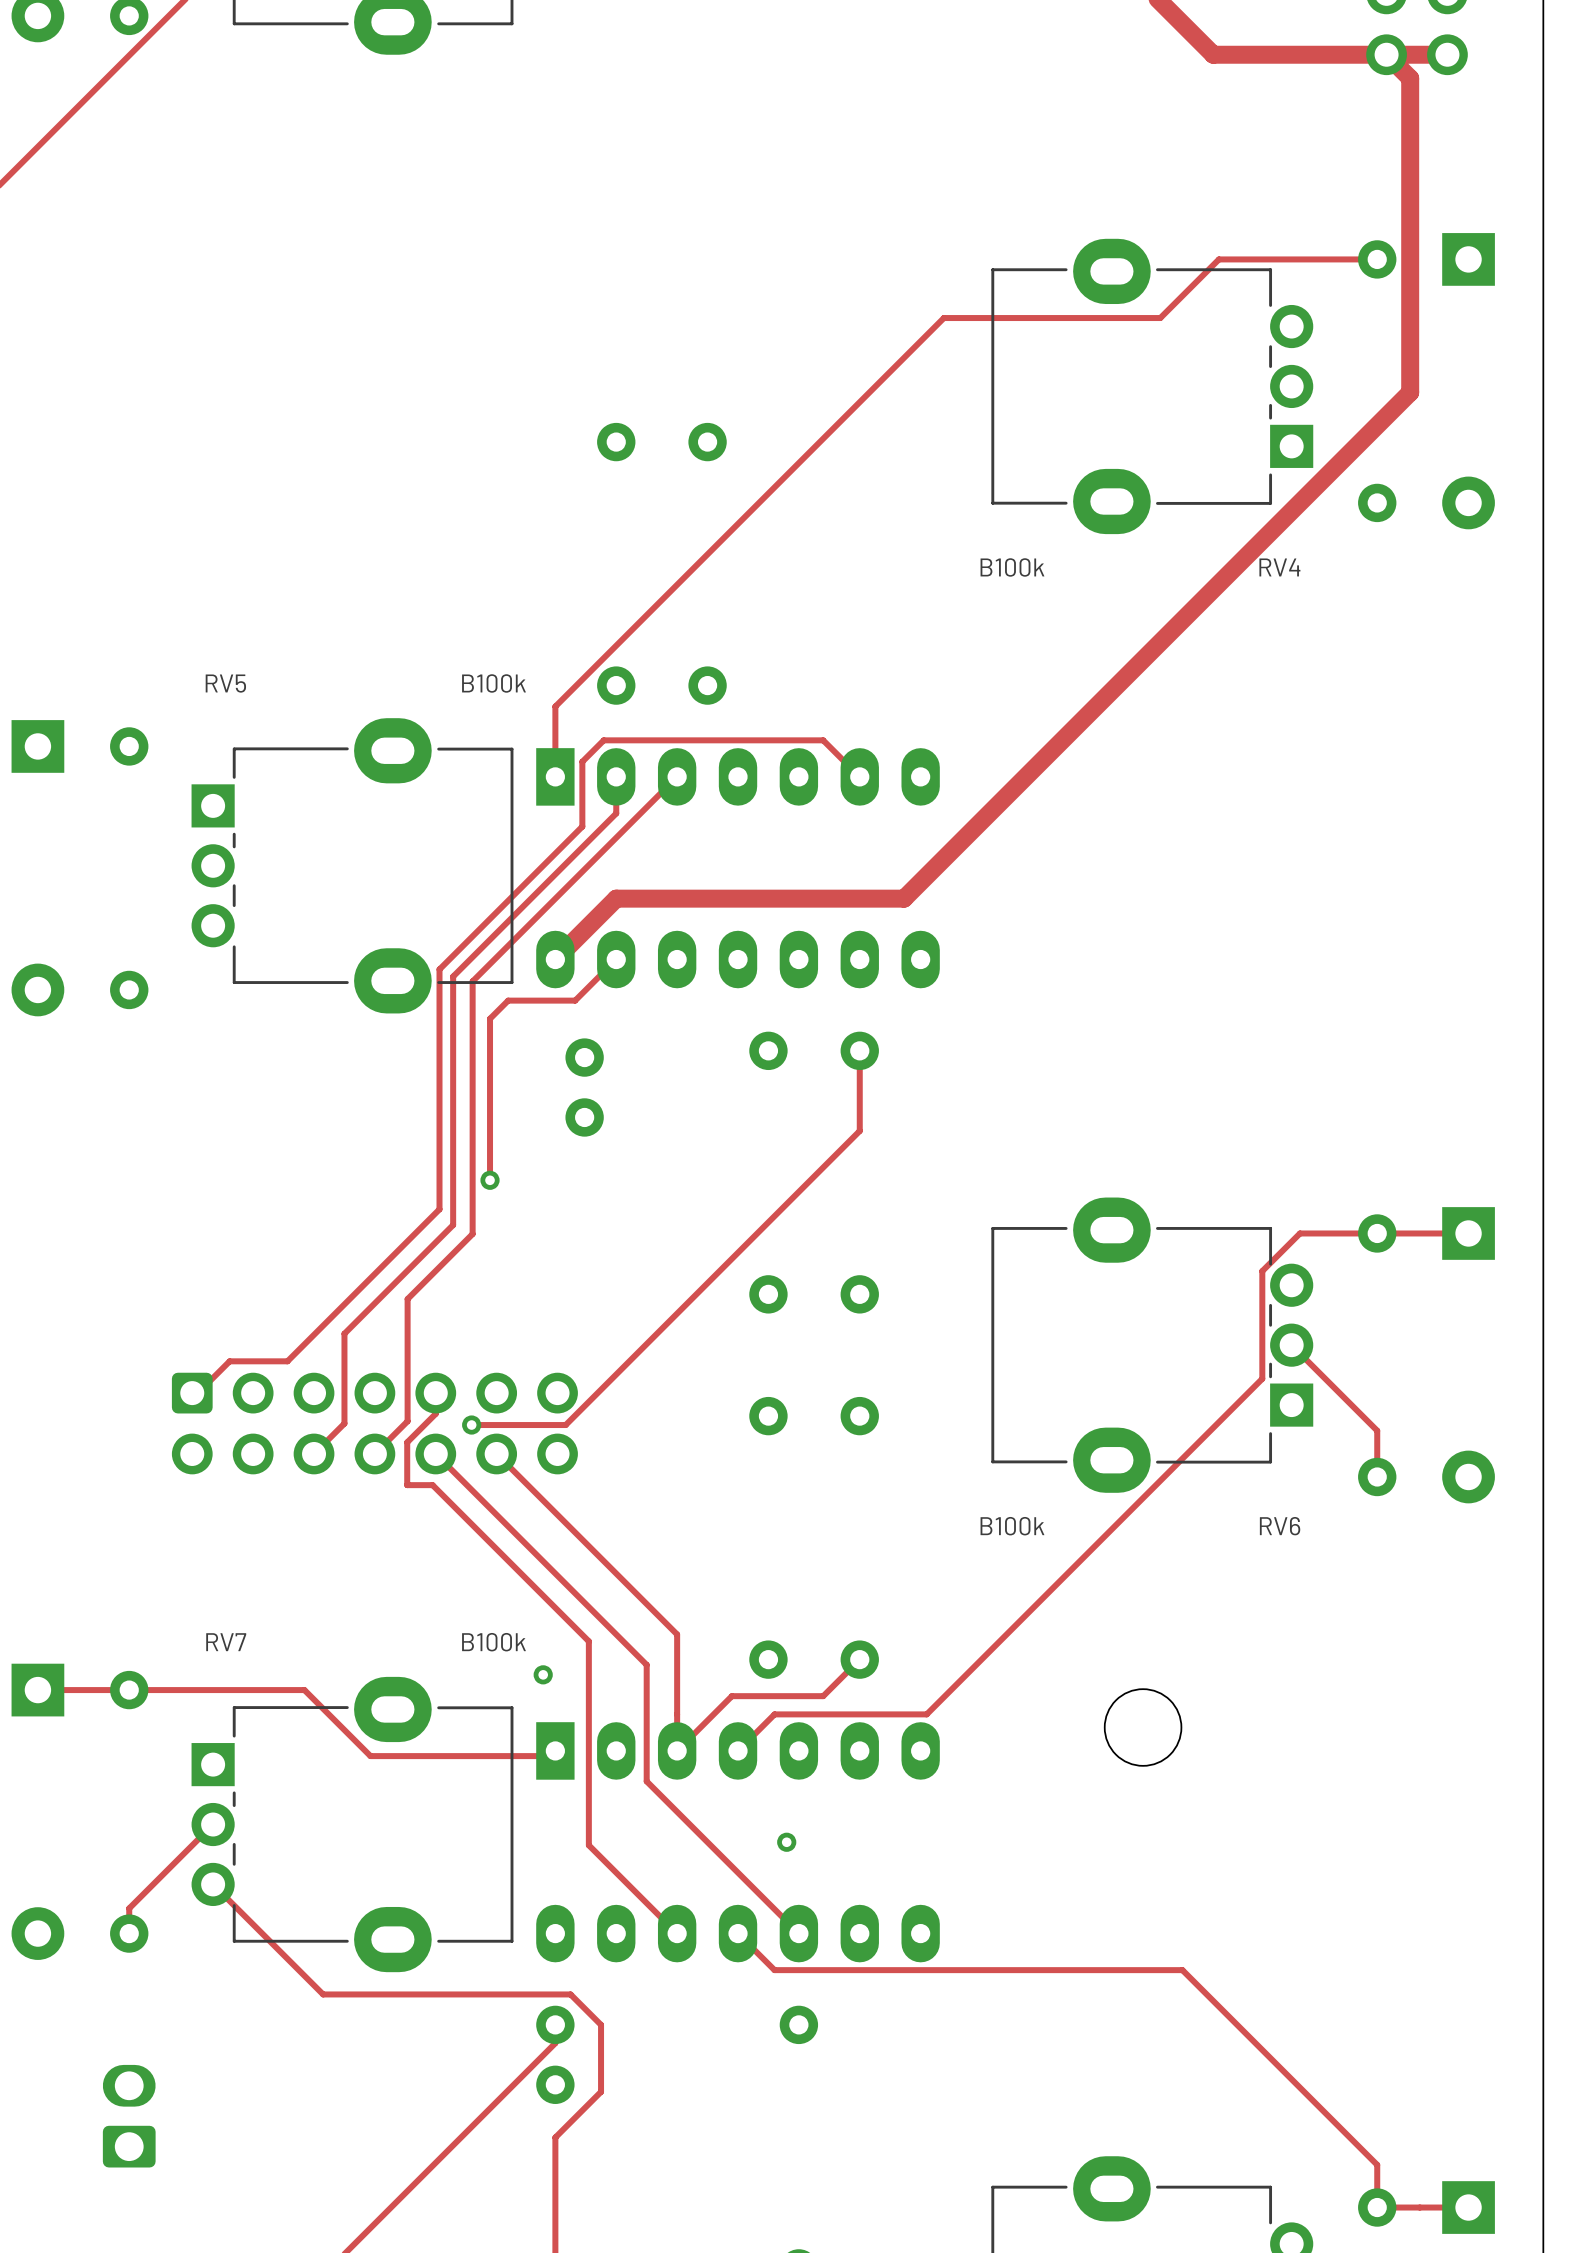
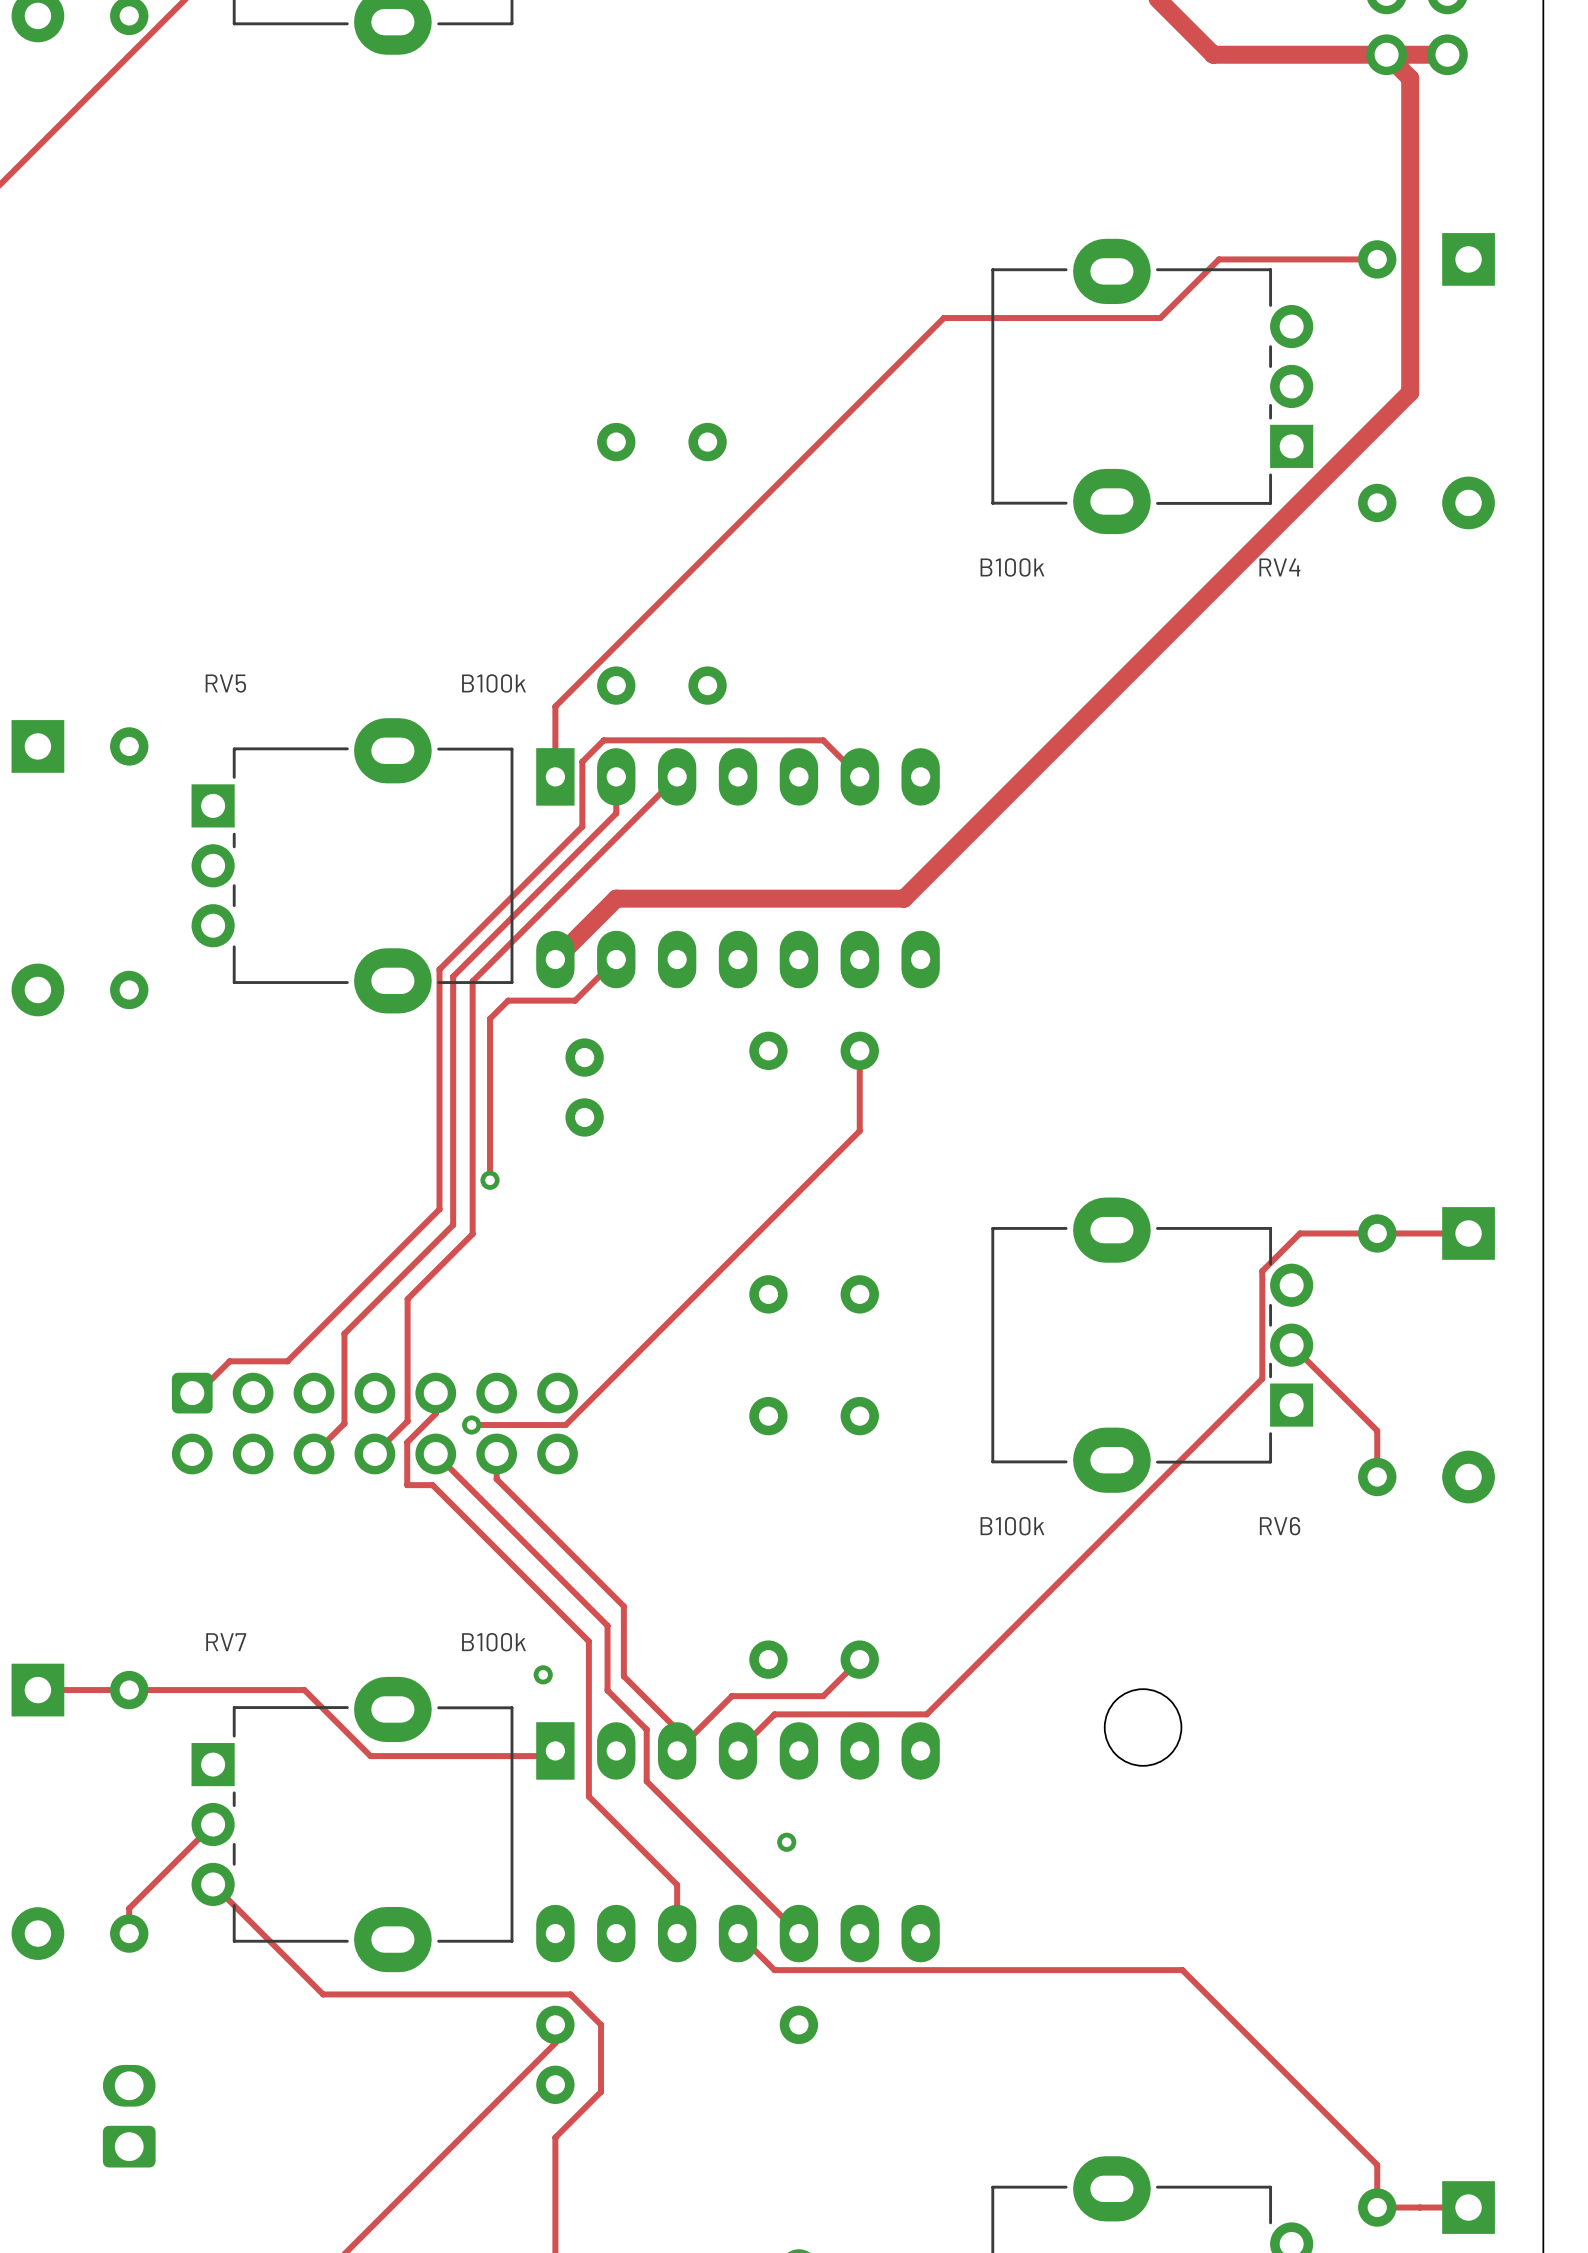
track: (496, 1453) (677, 1634) (677, 1729) -> (496, 1453) (496, 1479) (623, 1606) (623, 1676) (677, 1729)
track: (607, 1625) (646, 1664) (646, 1729) -> (607, 1625) (607, 1690) (646, 1729)
track: (588, 1796) (588, 1845) (677, 1933) -> (588, 1796) (677, 1884) (677, 1933)

